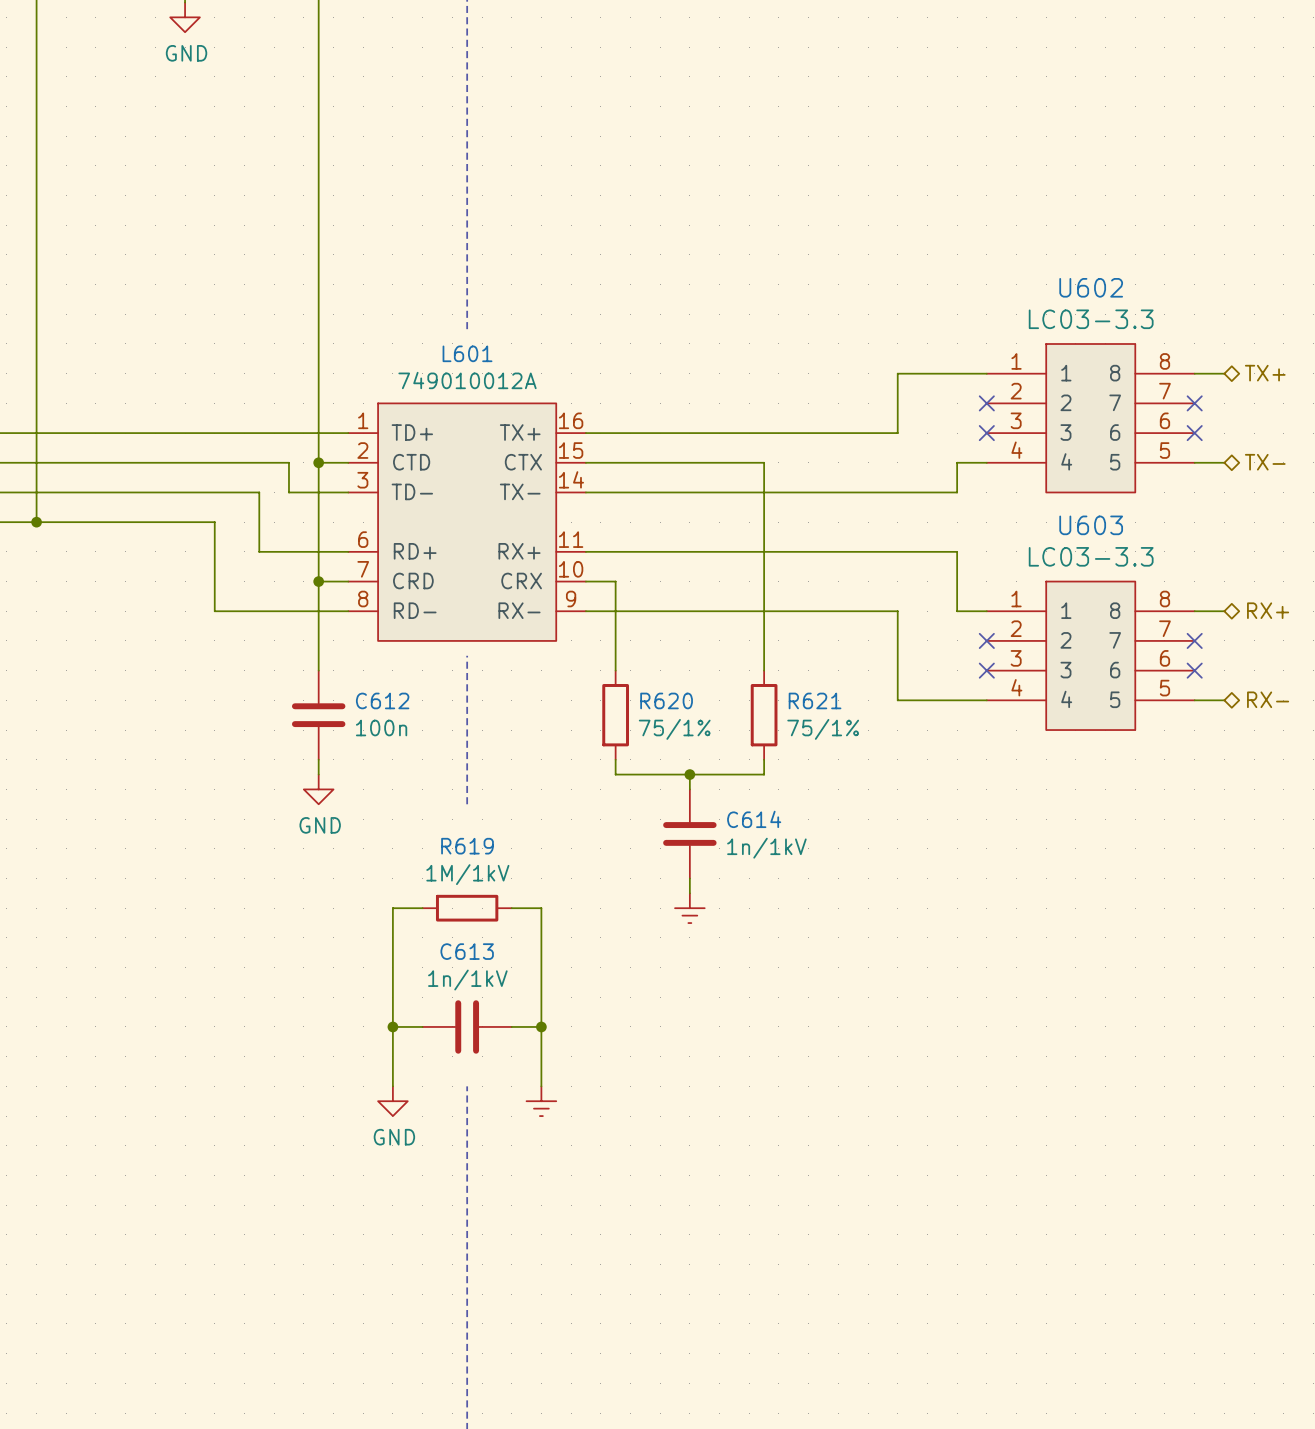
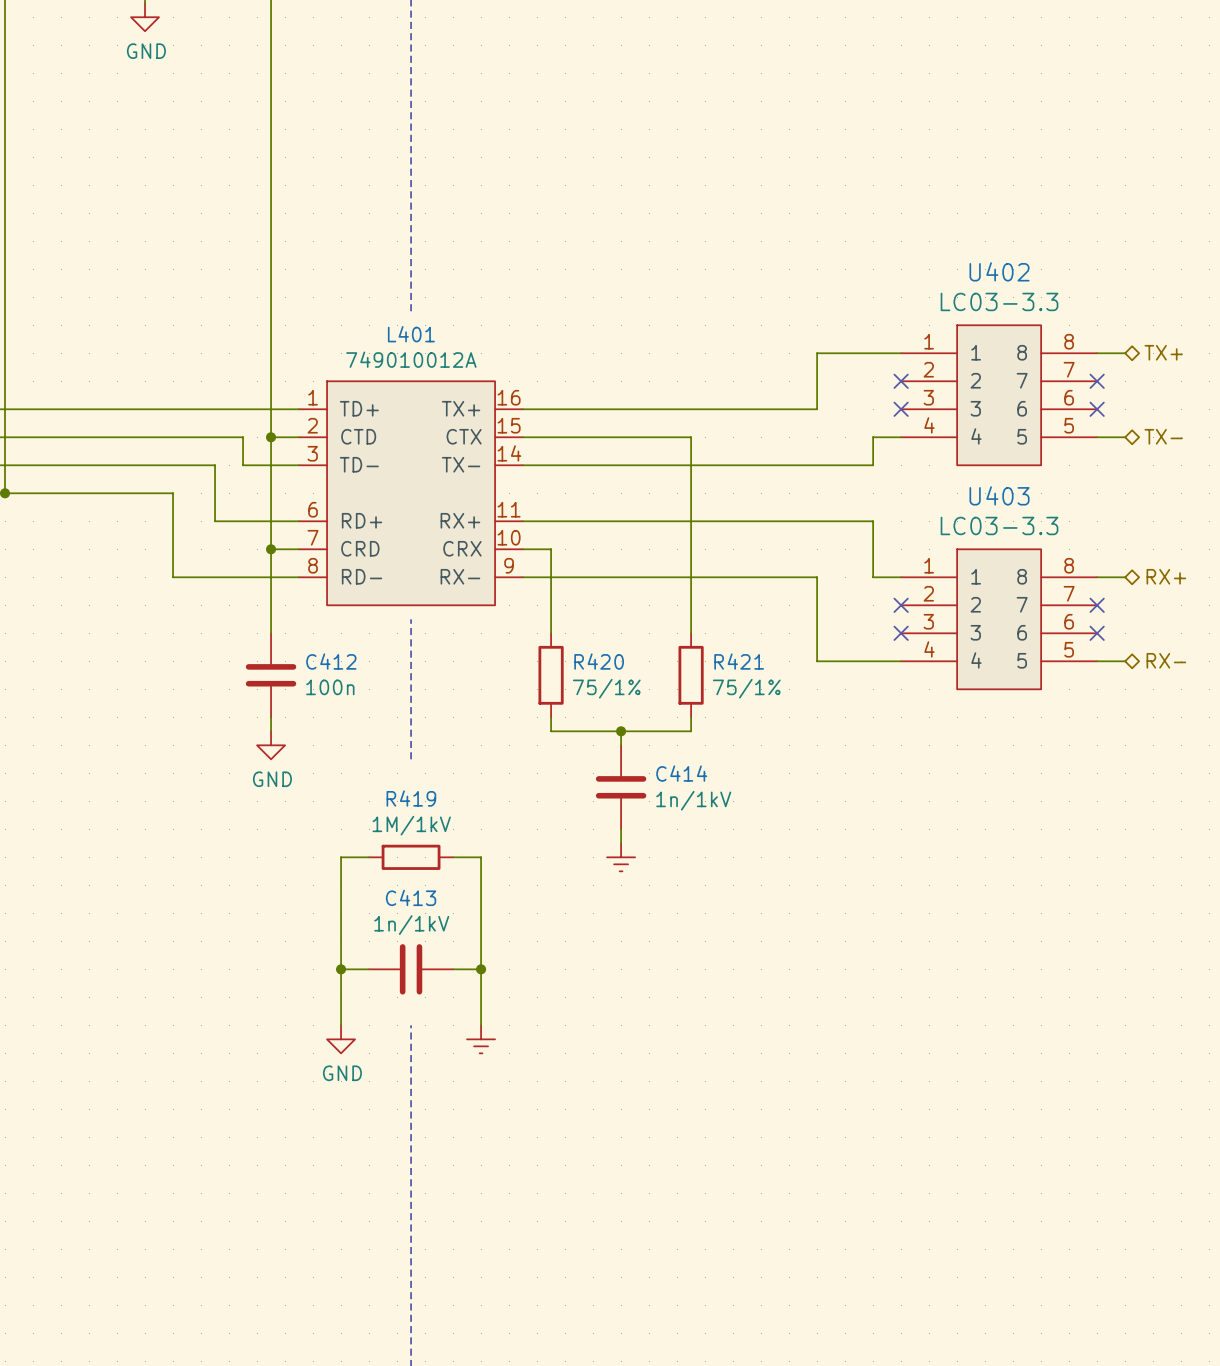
U602 name: U602 (1091, 287) -> U402 (999, 271)
L601 name: L601 (467, 353) -> L401 (411, 334)
U603 name: U603 (1091, 525) -> U403 (999, 495)
C612 name: C612 (382, 700) -> C412 (331, 661)
R620 name: R620 (666, 700) -> R420 (599, 661)
R621 name: R621 (815, 700) -> R421 (739, 661)
C614 name: C614 (754, 819) -> C414 (681, 773)
R619 name: R619 (467, 846) -> R419 (411, 798)
C613 name: C613 (467, 951) -> C413 (411, 897)

